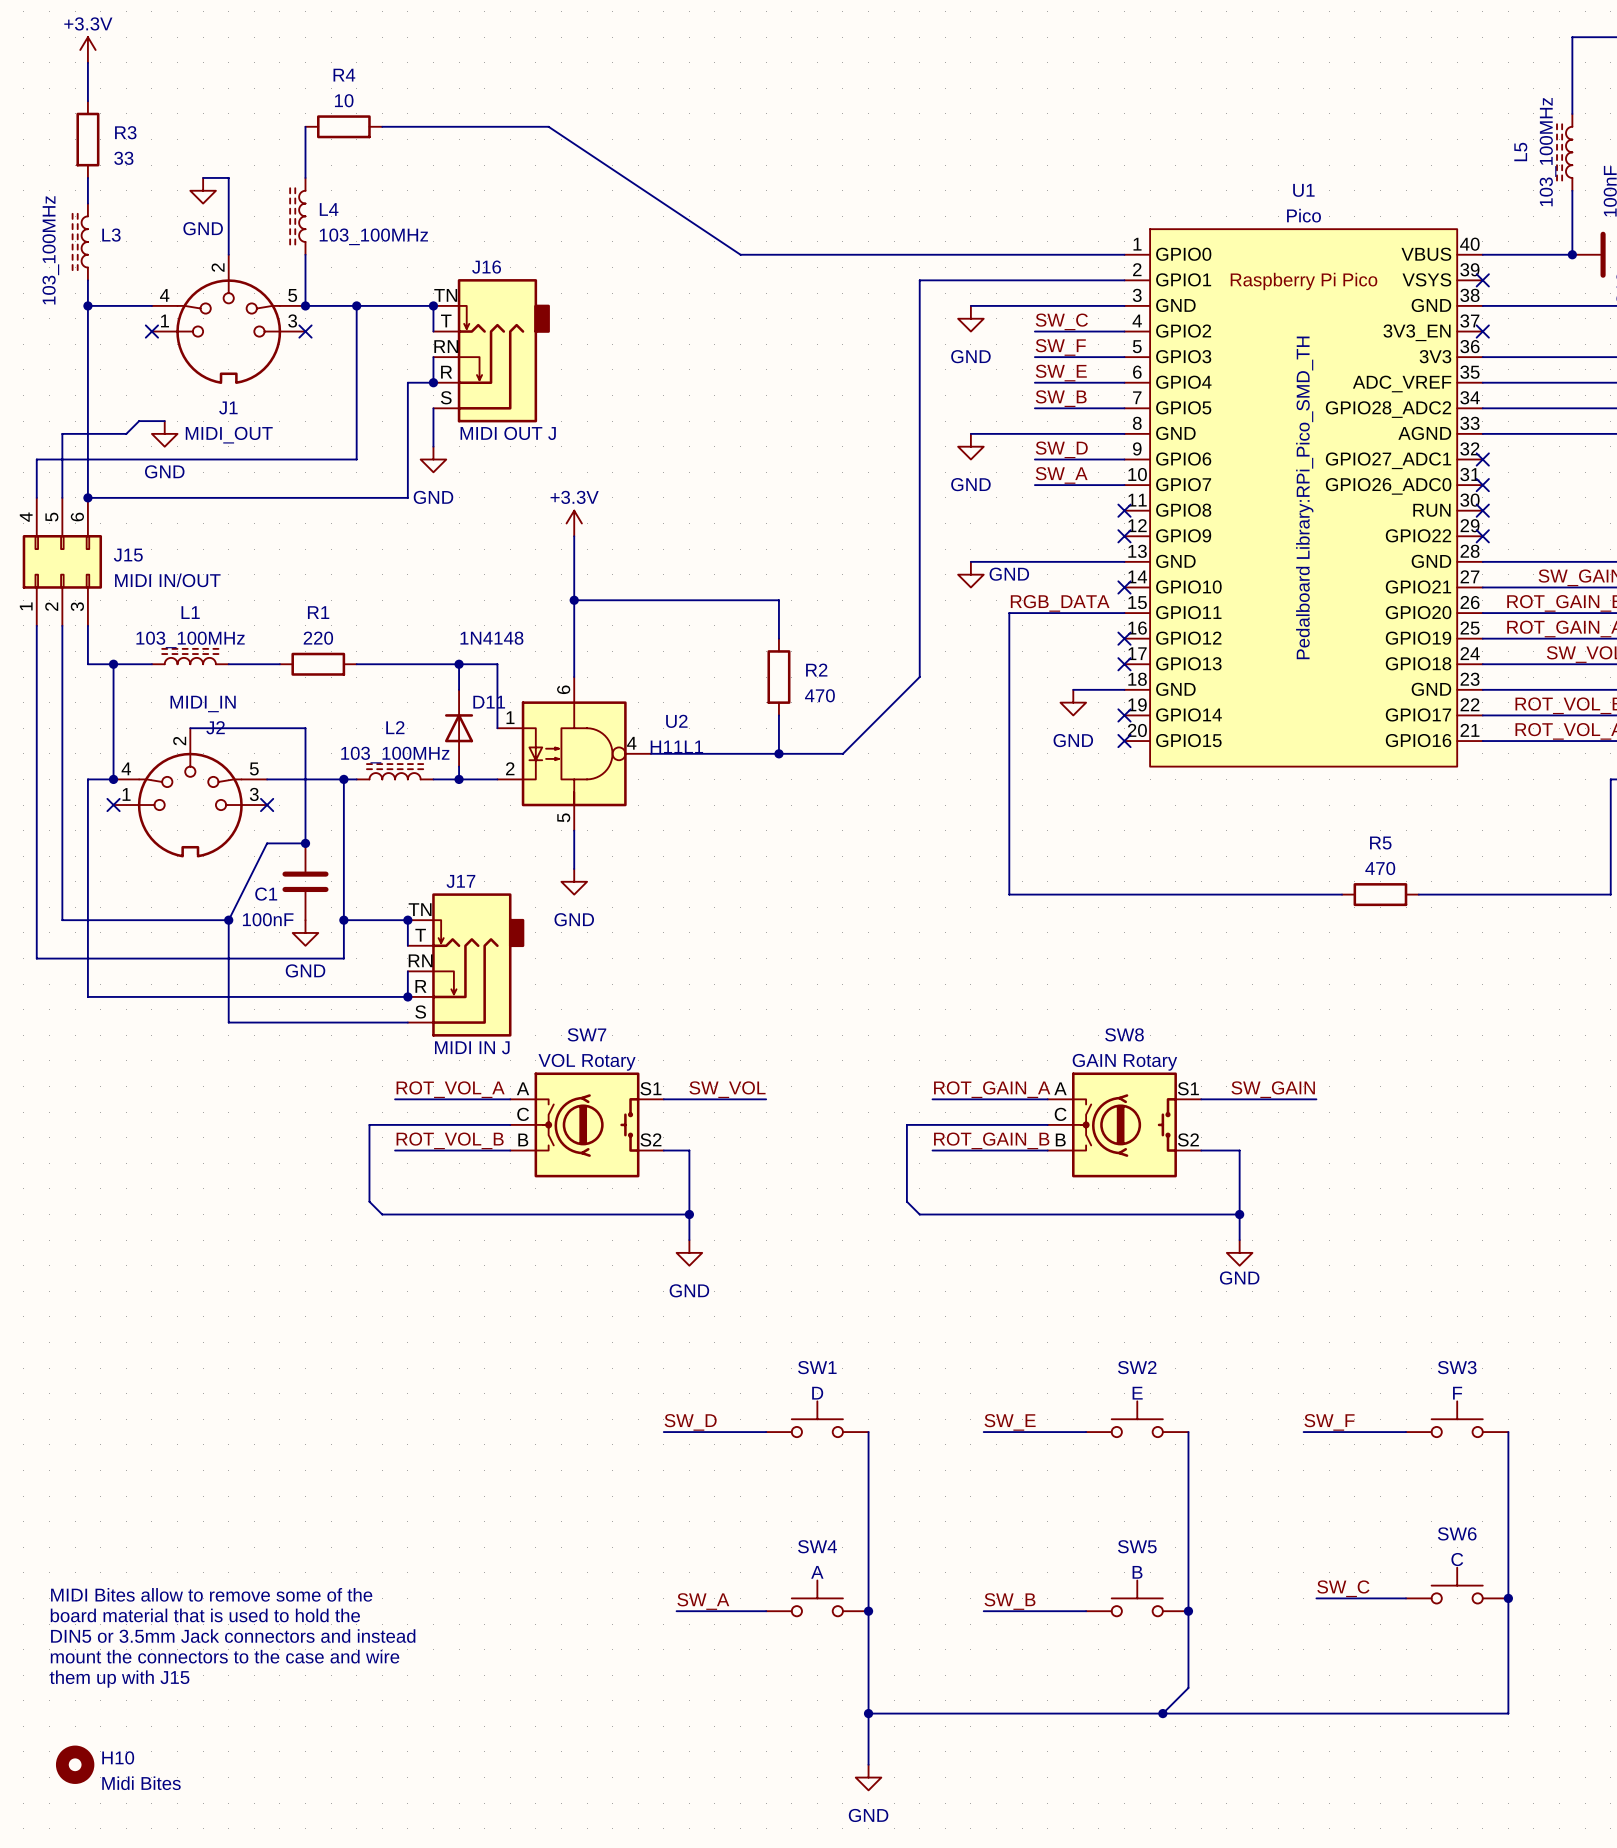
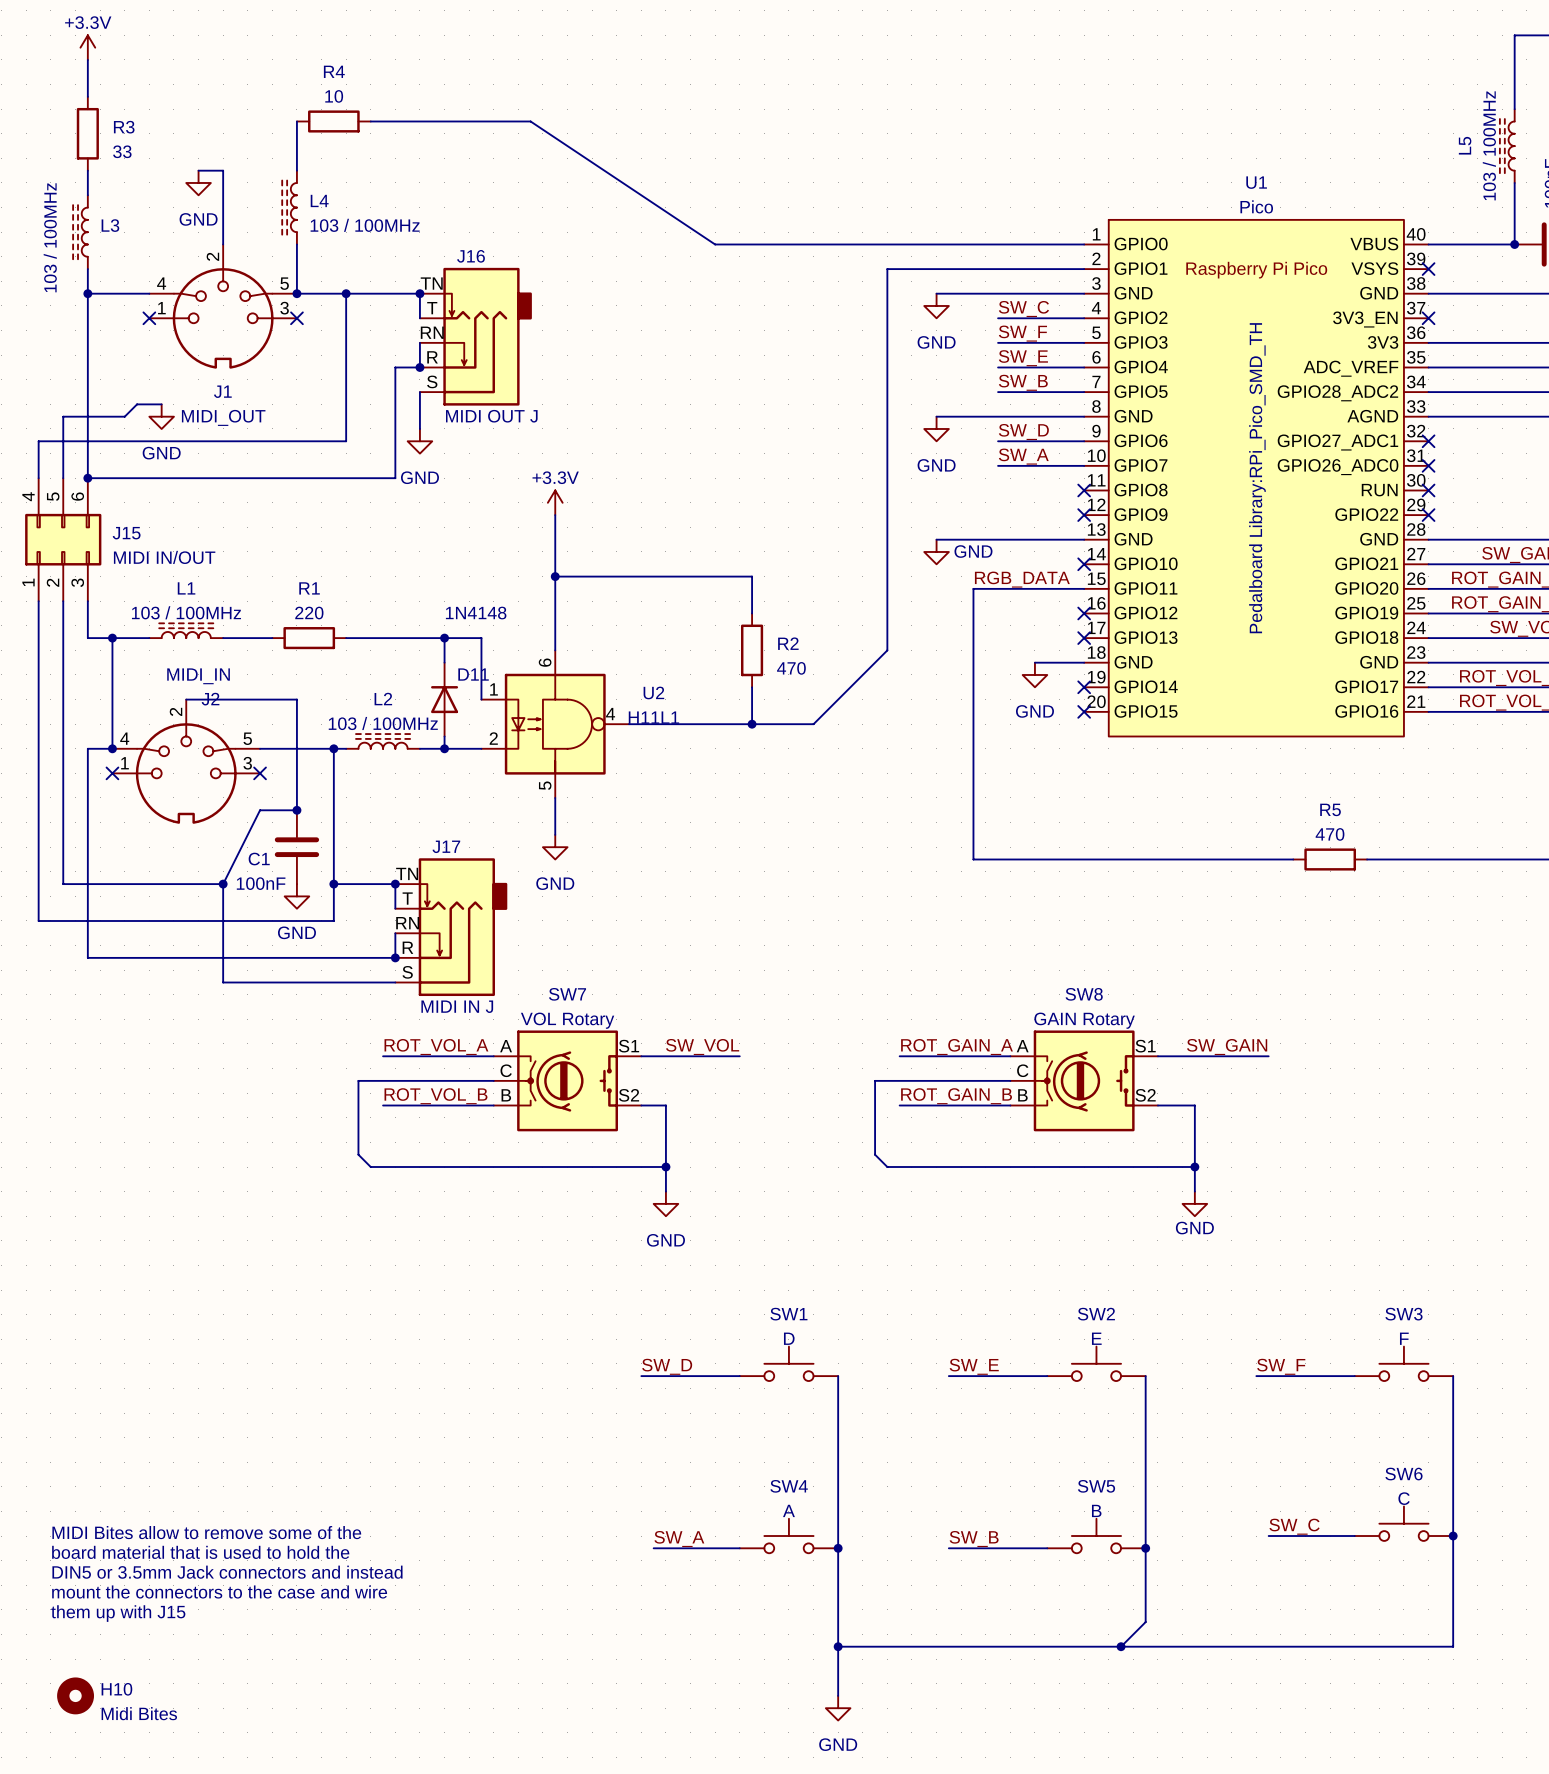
L5 value: 103_100MHz (1548, 152) -> 103 / 100MHz (1489, 145)
L4 value: 103_100MHz (373, 236) -> 103 / 100MHz (365, 225)
L3 value: 103_100MHz (50, 250) -> 103 / 100MHz (50, 237)
L1 value: 103_100MHz (190, 639) -> 103 / 100MHz (186, 612)
L2 value: 103_100MHz (395, 755) -> 103 / 100MHz (383, 723)

